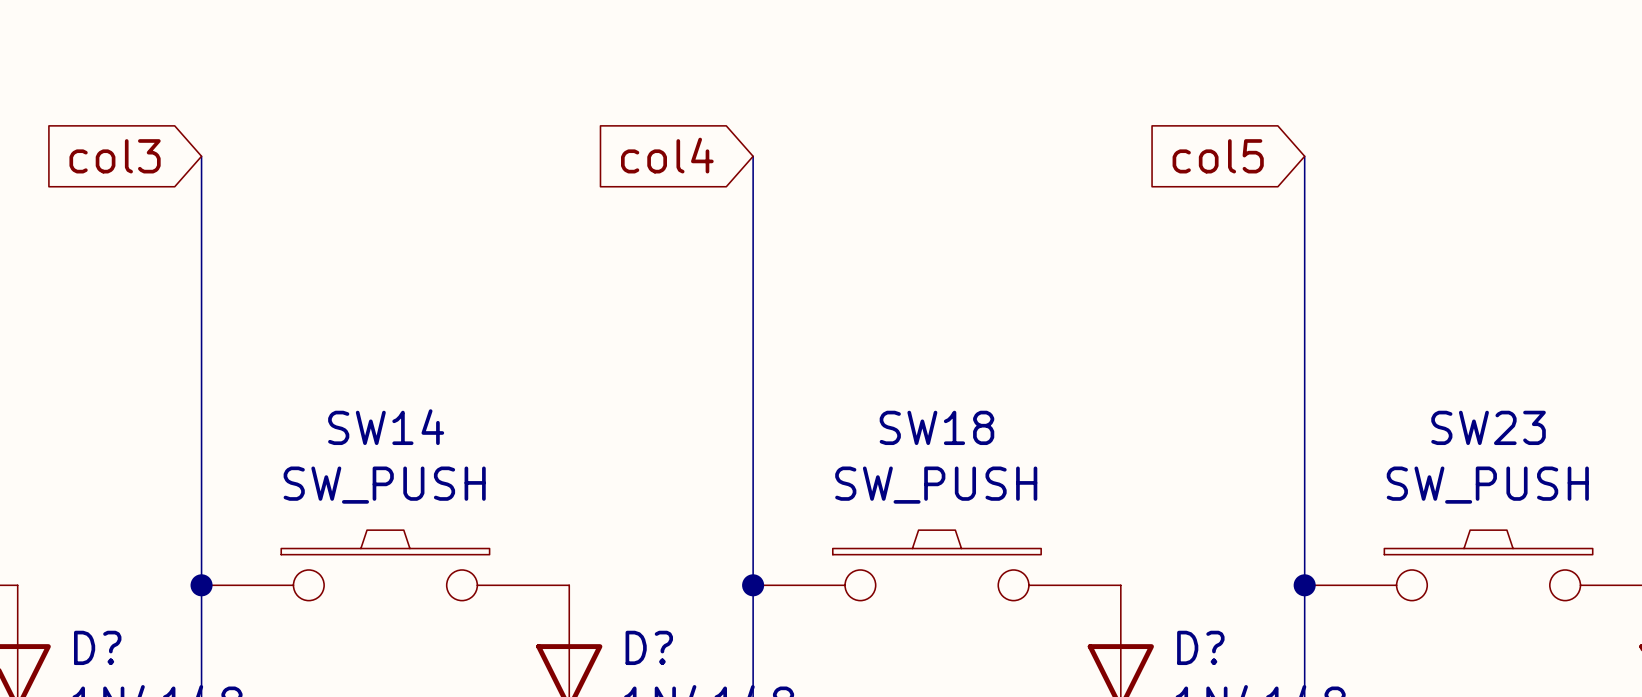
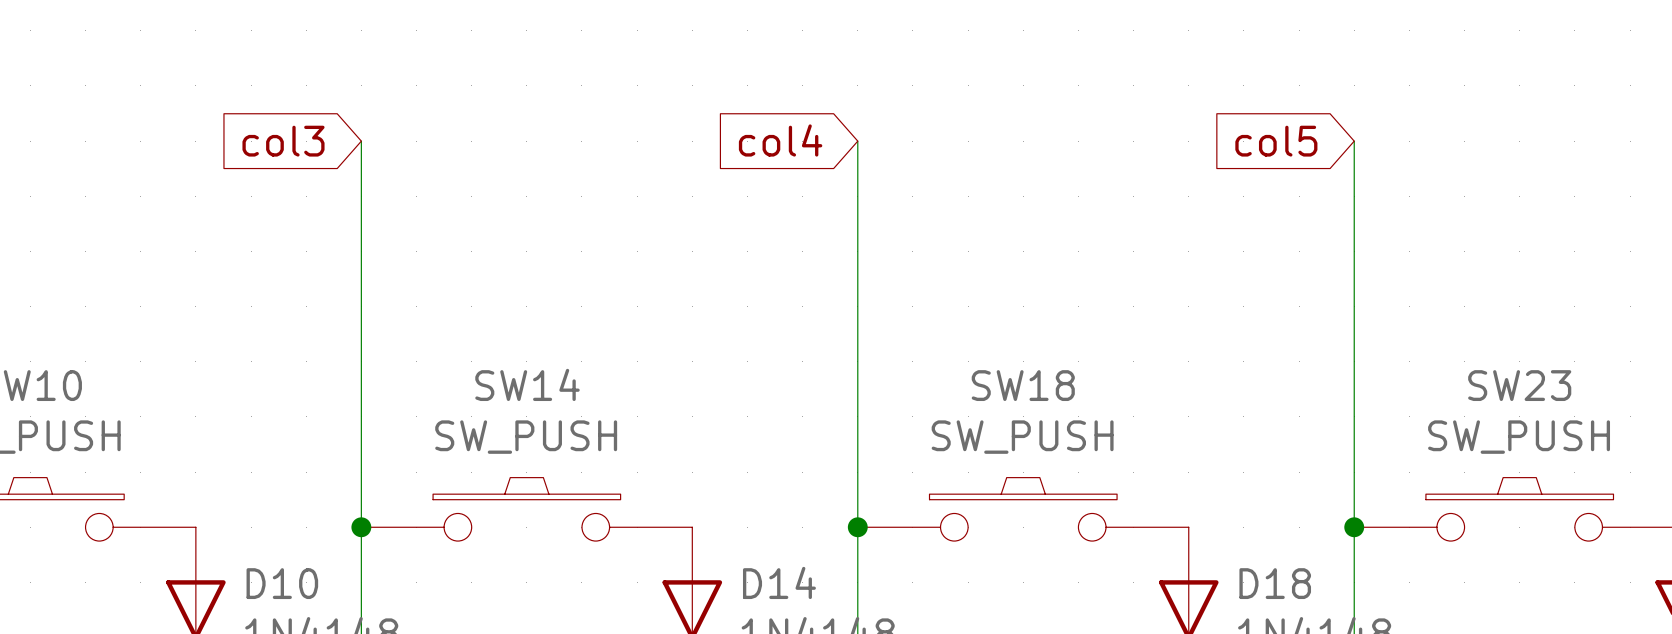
D? name: D? (97, 647) -> D10 (282, 583)
D? name: D? (649, 647) -> D14 (779, 582)
D? name: D? (1200, 647) -> D18 (1275, 583)

